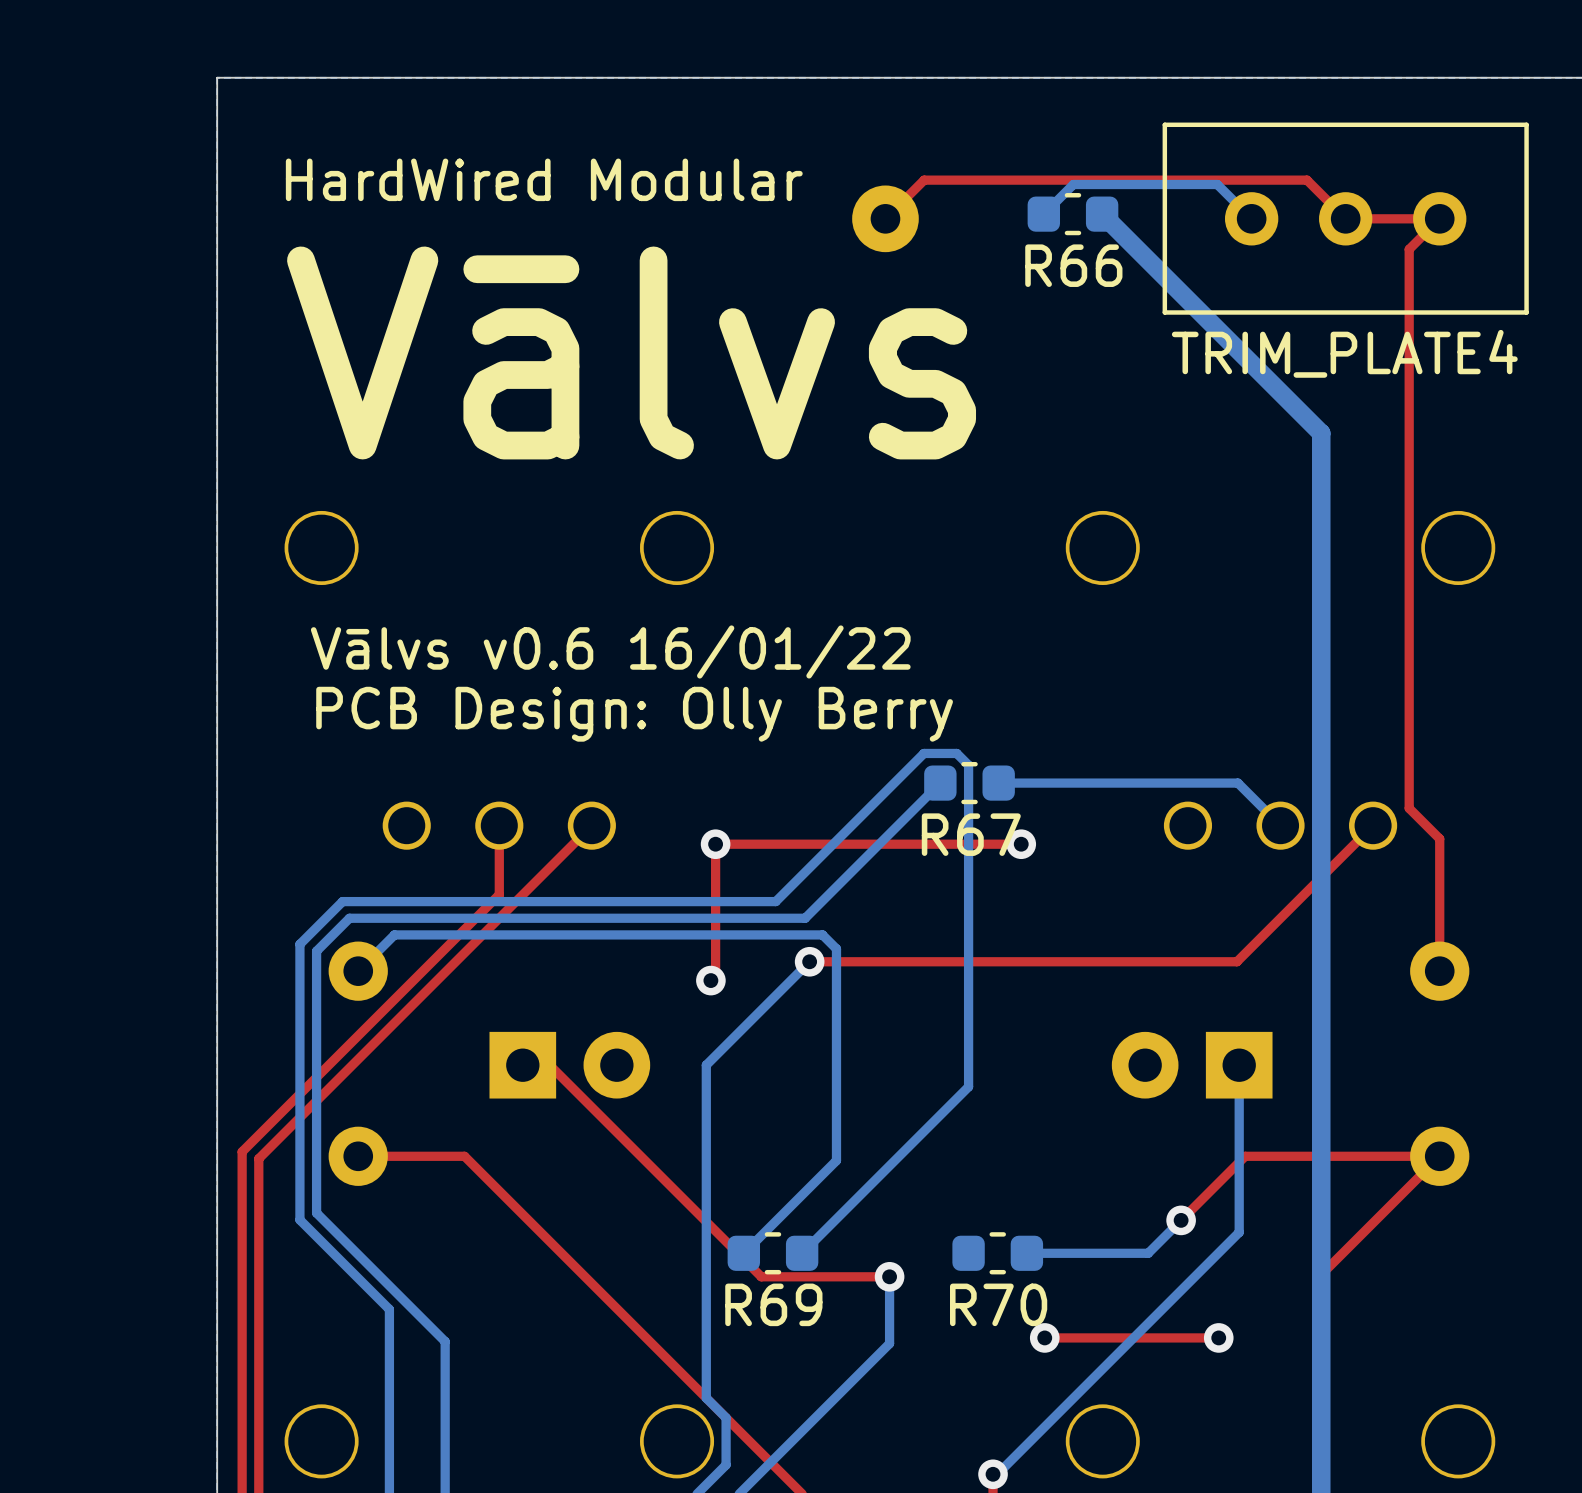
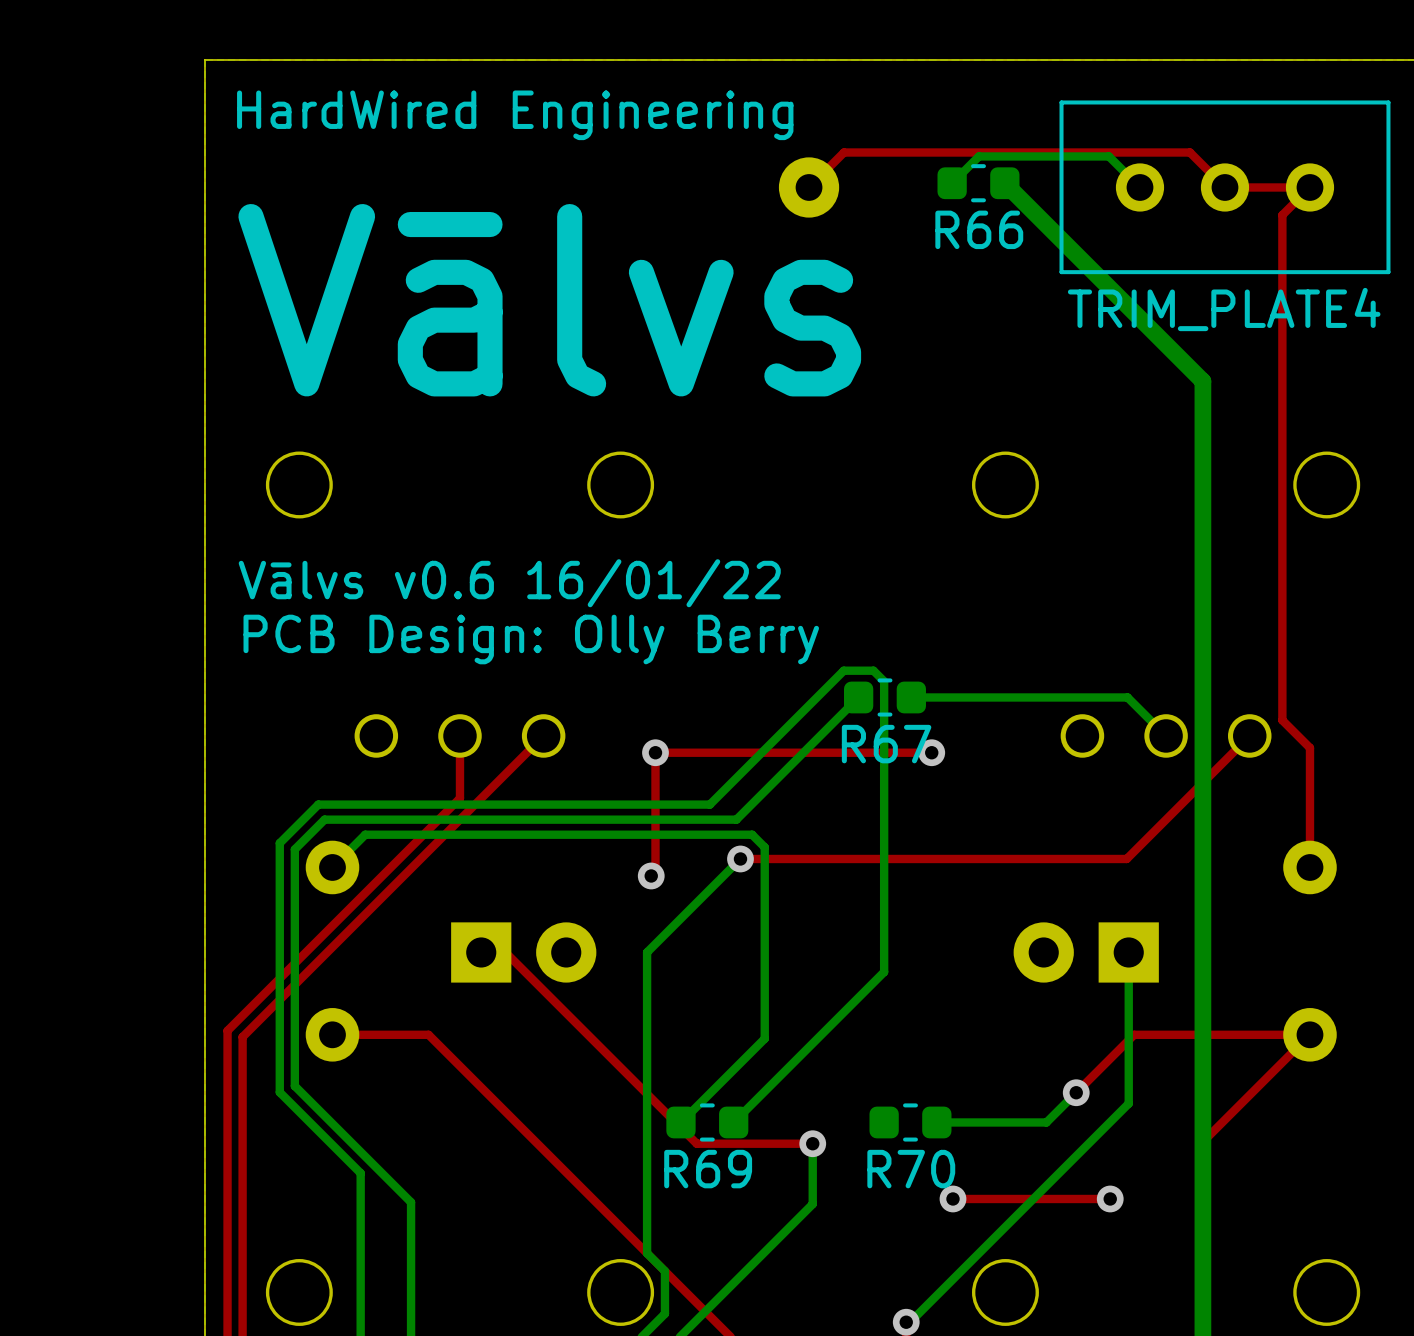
text: none -> HardWired Engineering (515, 115)
text: HardWired Modular (544, 179) -> none
text position: Vālvs (631, 352) -> Vālvs (549, 300)
text position: Vālvs v0.6 16/01/22 (610, 651) -> Vālvs v0.6 16/01/22 (509, 583)
text position: PCB Design: Olly Berry (634, 714) -> PCB Design: Olly Berry (531, 639)

